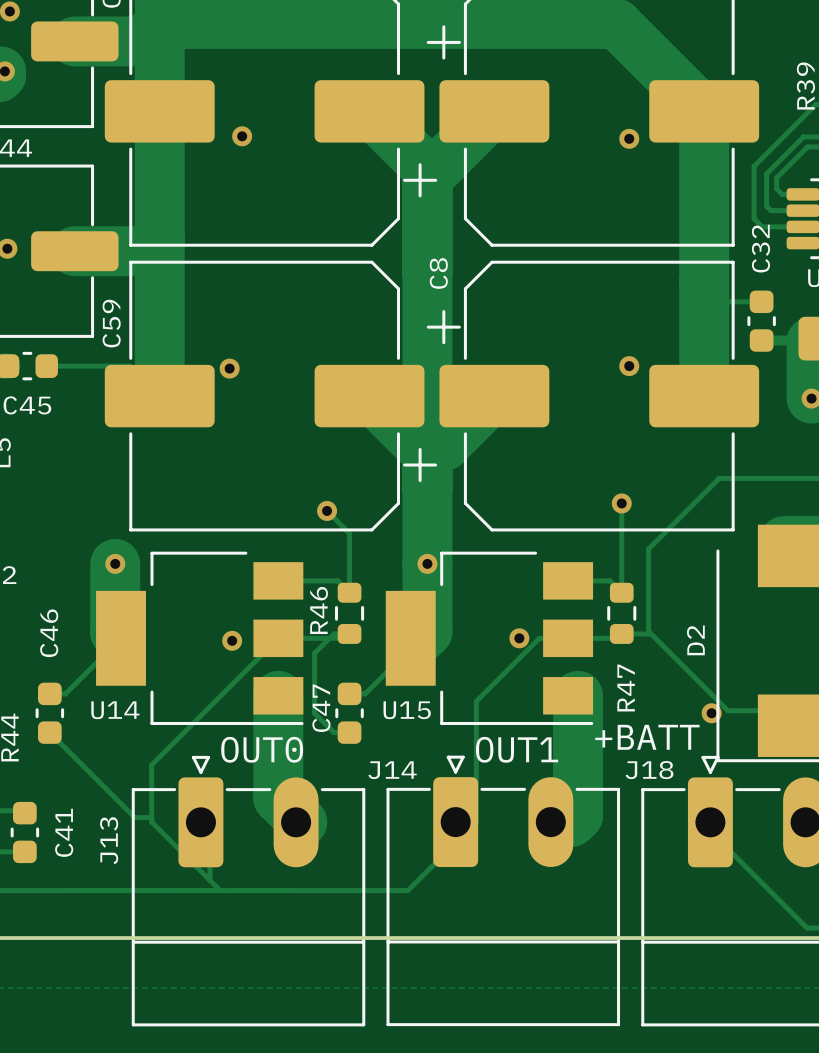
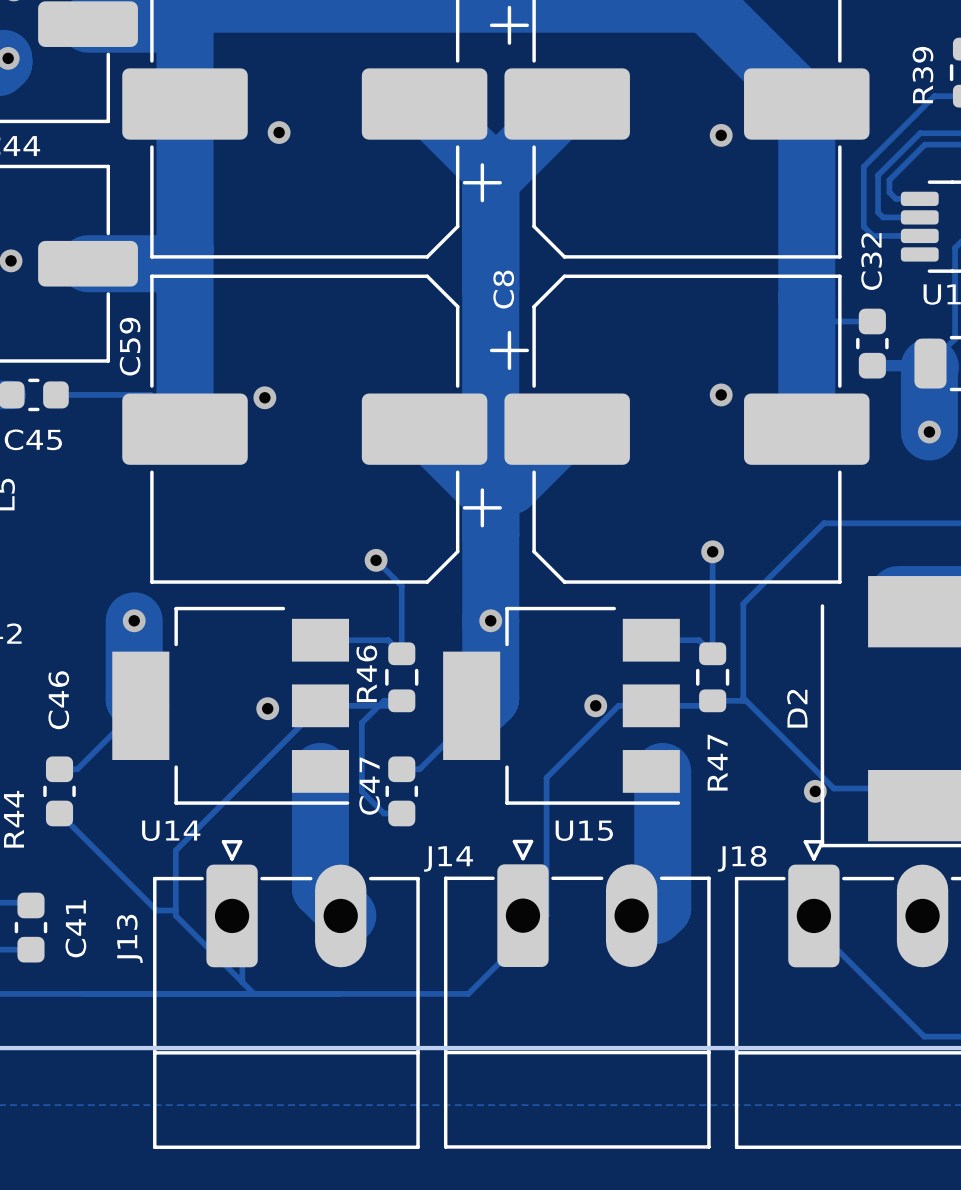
U14 name position: U14 (115, 710) -> U14 (171, 830)
U15 name position: U15 (407, 710) -> U15 (584, 830)
text: +BATT (647, 737) -> none
text: OUT0 (262, 749) -> none
text: OUT1 (517, 749) -> none

